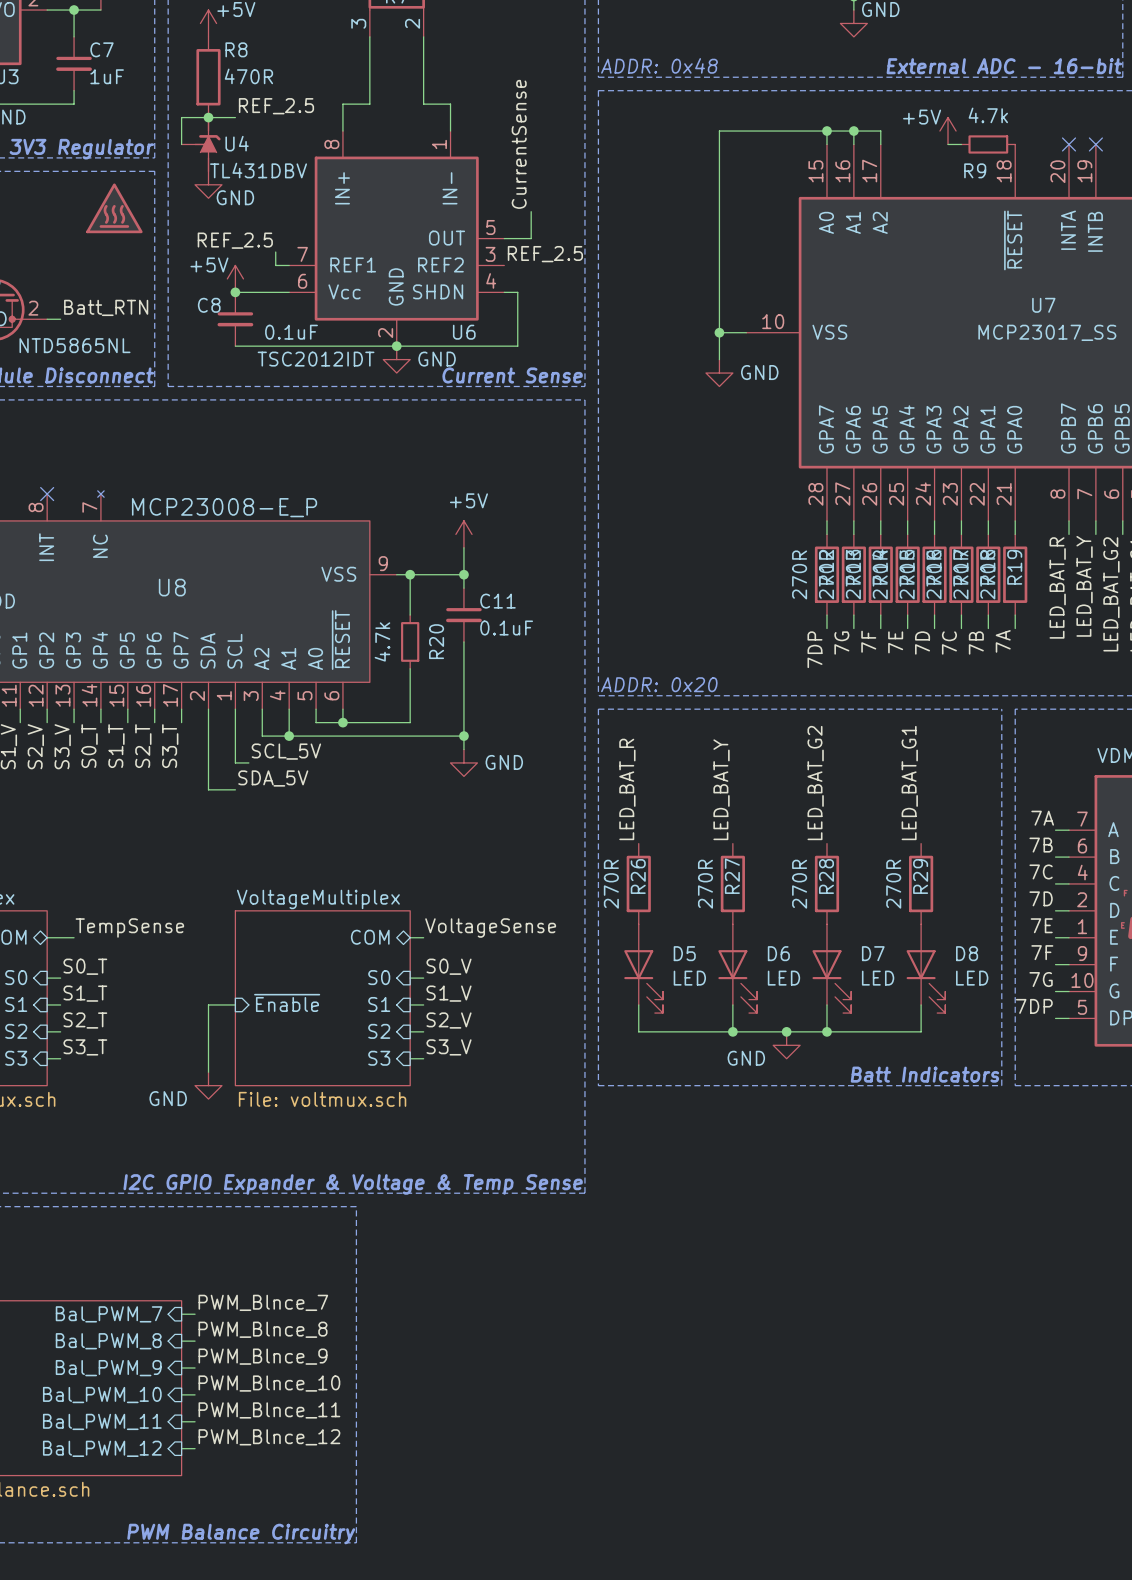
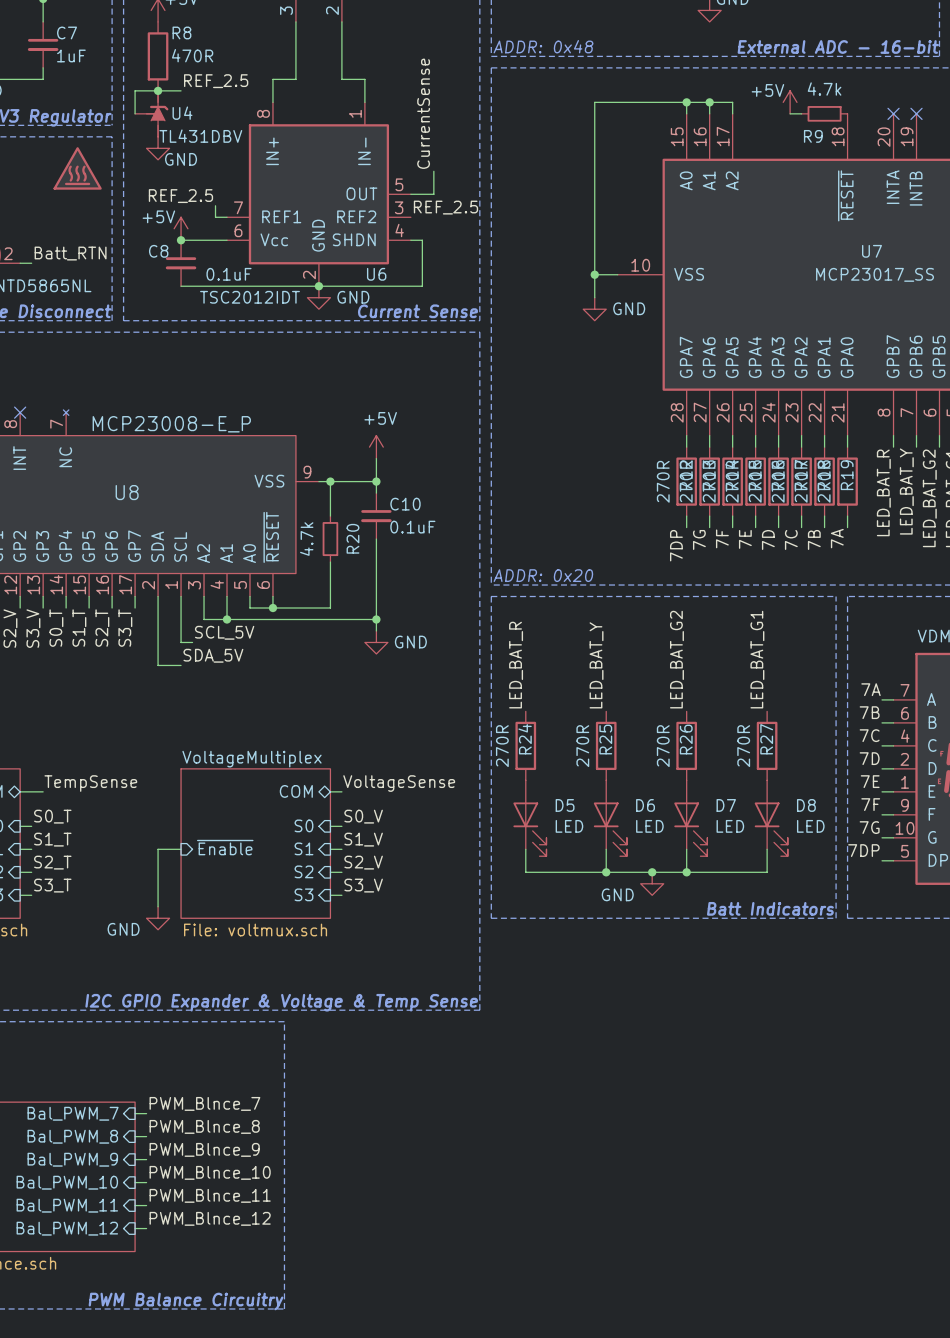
C11 name: C11 (498, 601) -> C10 (405, 504)
R26 name: R26 (638, 876) -> R24 (525, 739)
R27 name: R27 (732, 876) -> R25 (605, 739)
R28 name: R28 (826, 876) -> R26 (686, 739)
R29 name: R29 (920, 876) -> R27 (766, 739)

